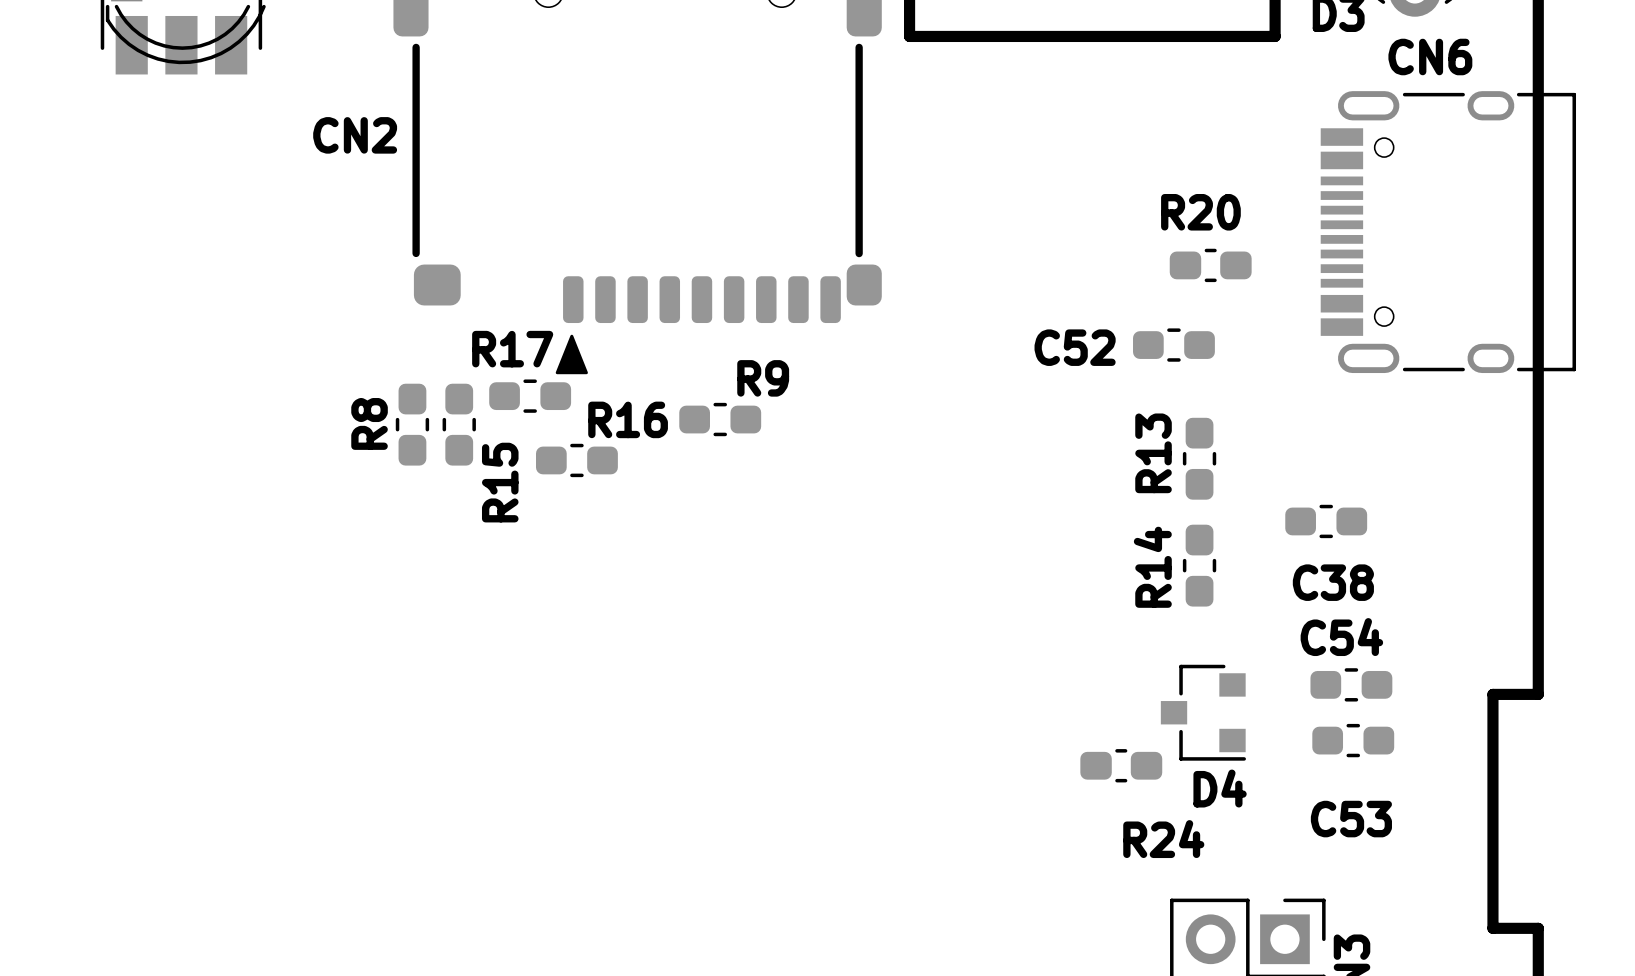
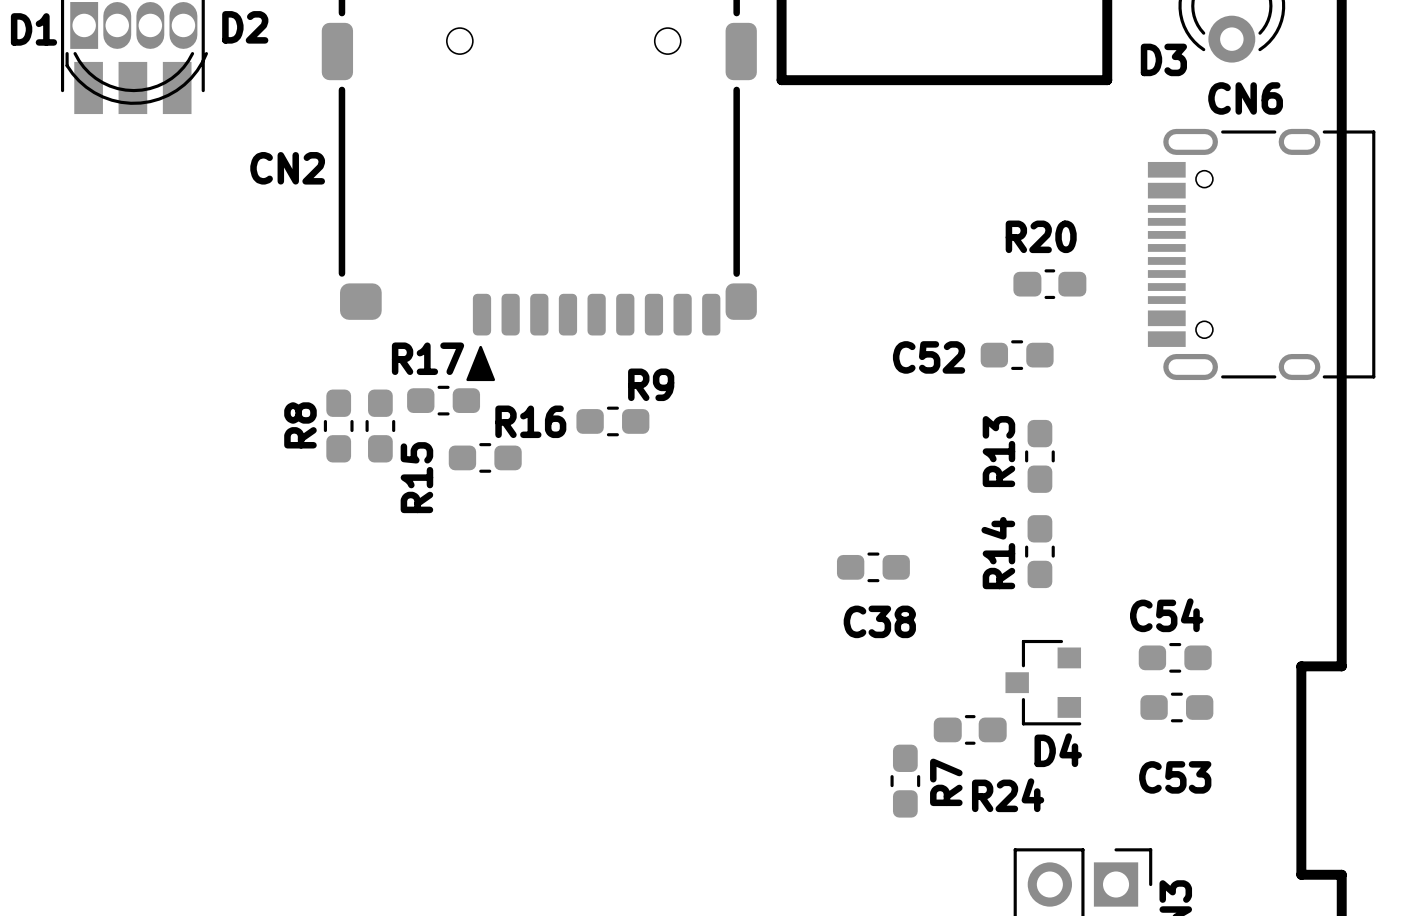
C38 position: (1326, 521) -> (873, 567)
R7: none -> (905, 781)

